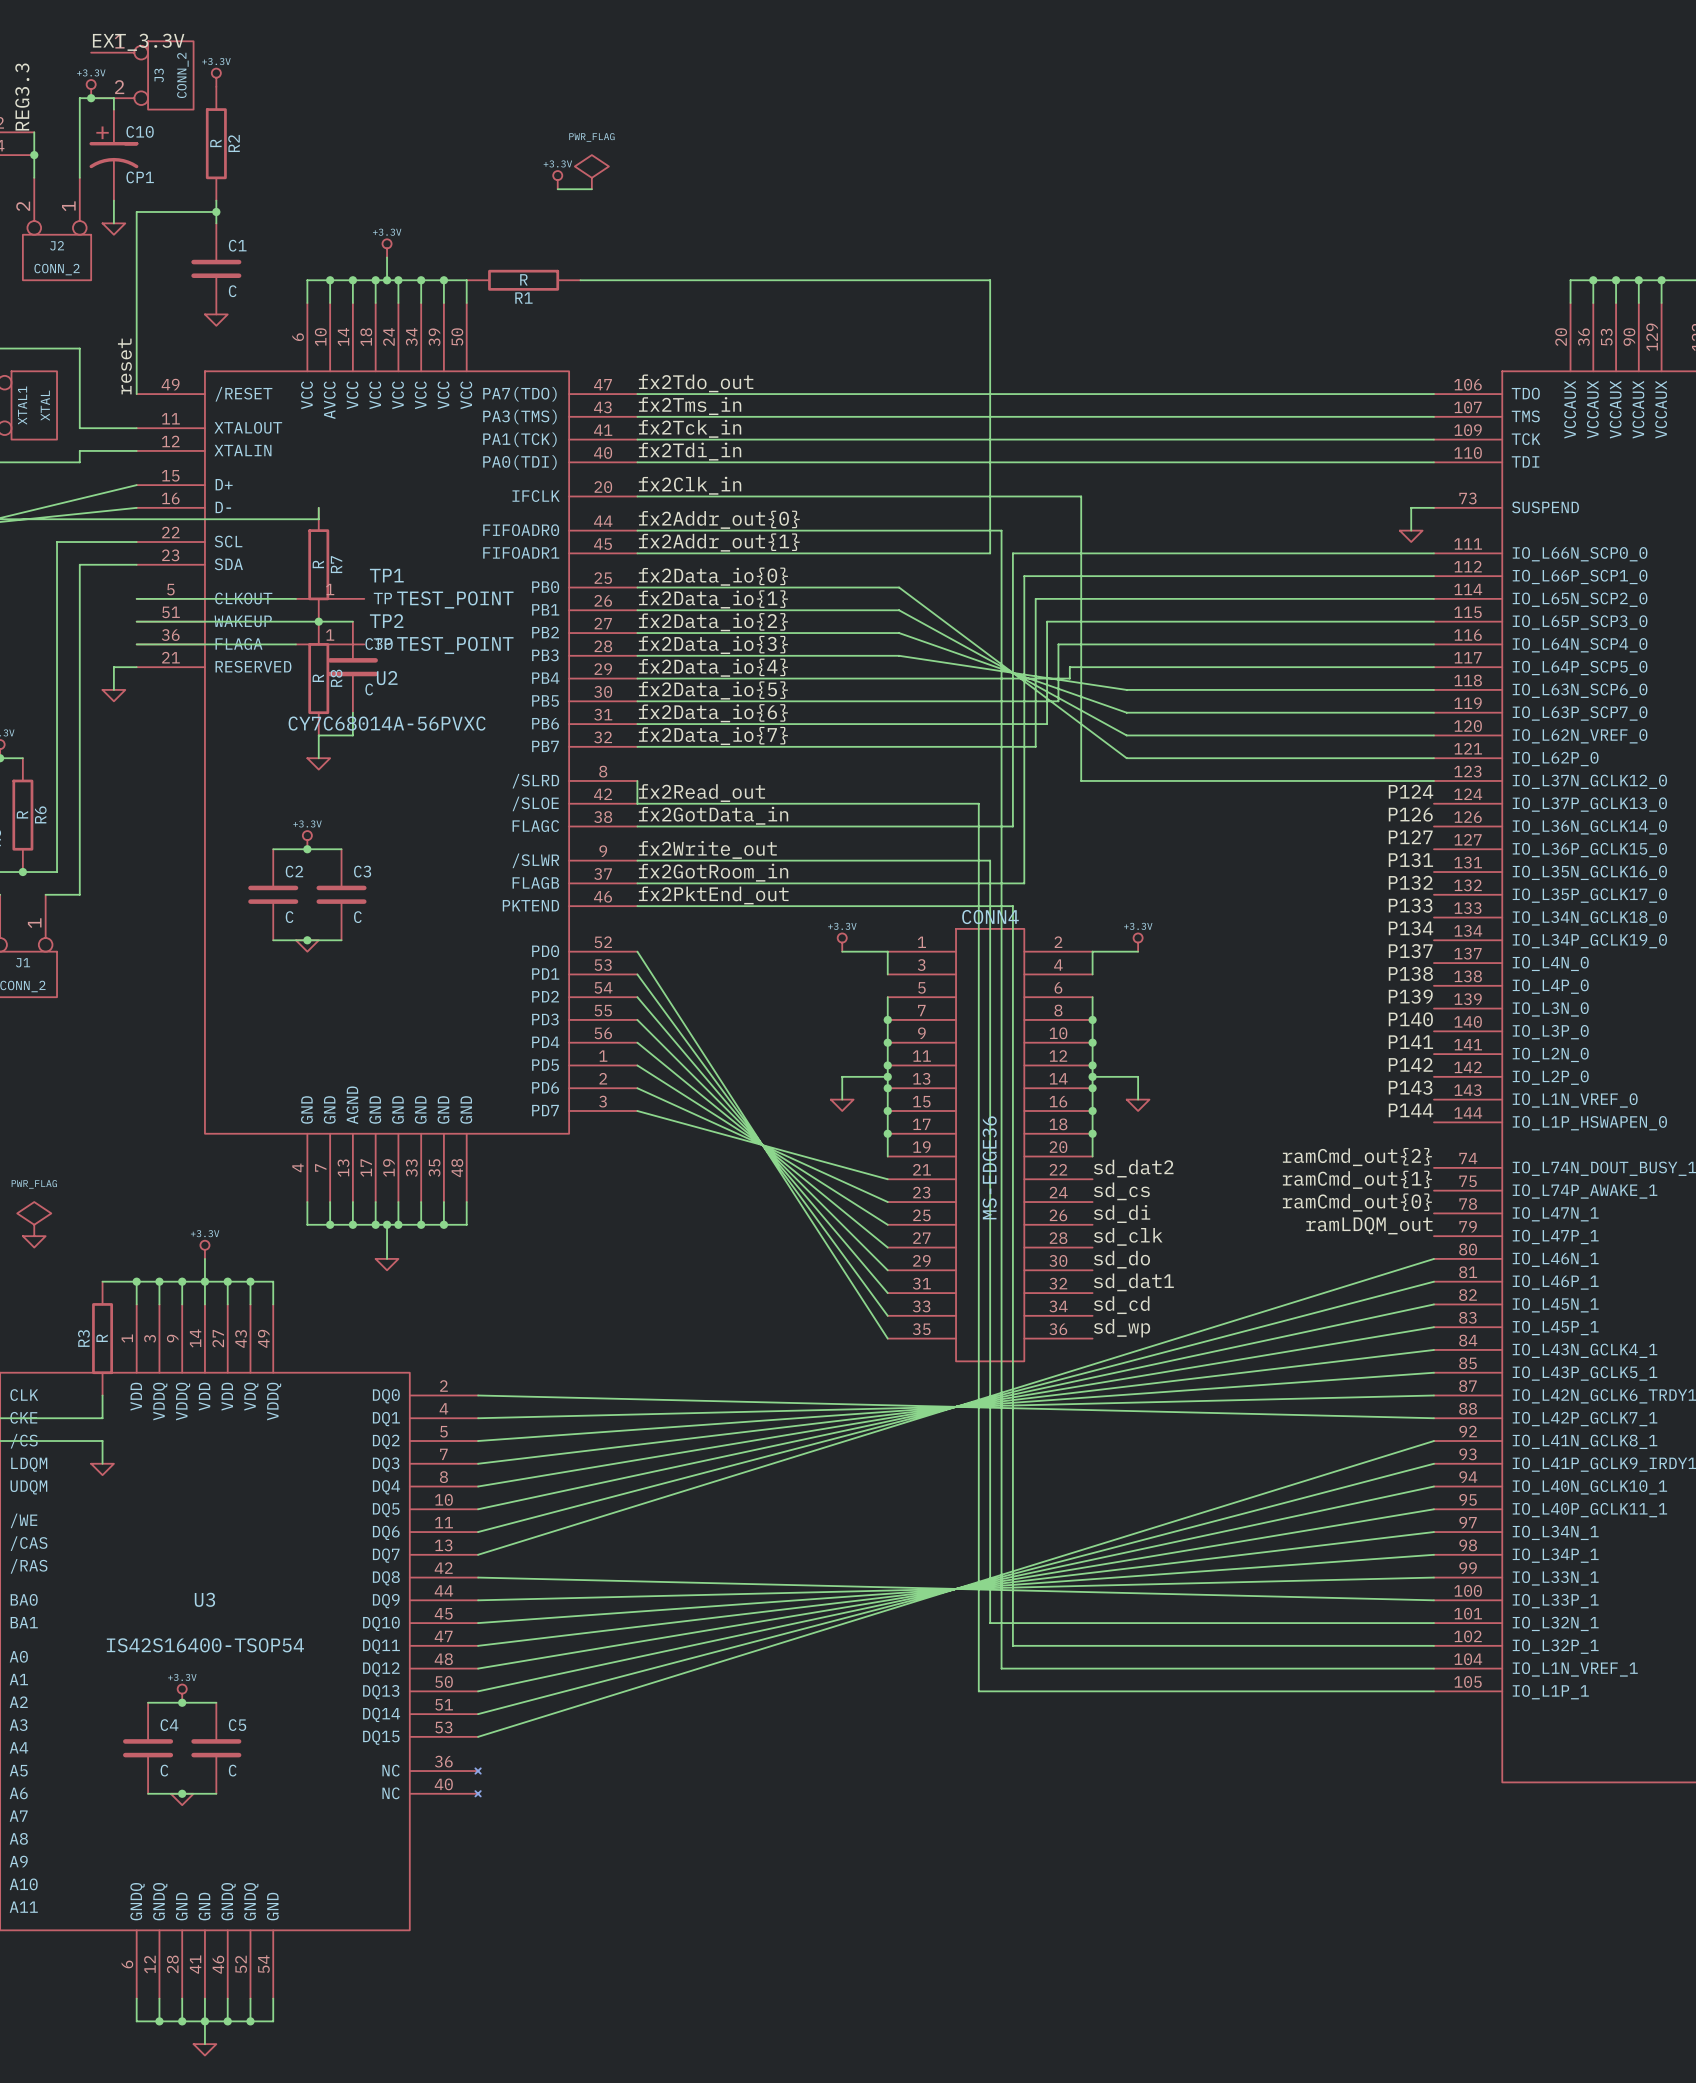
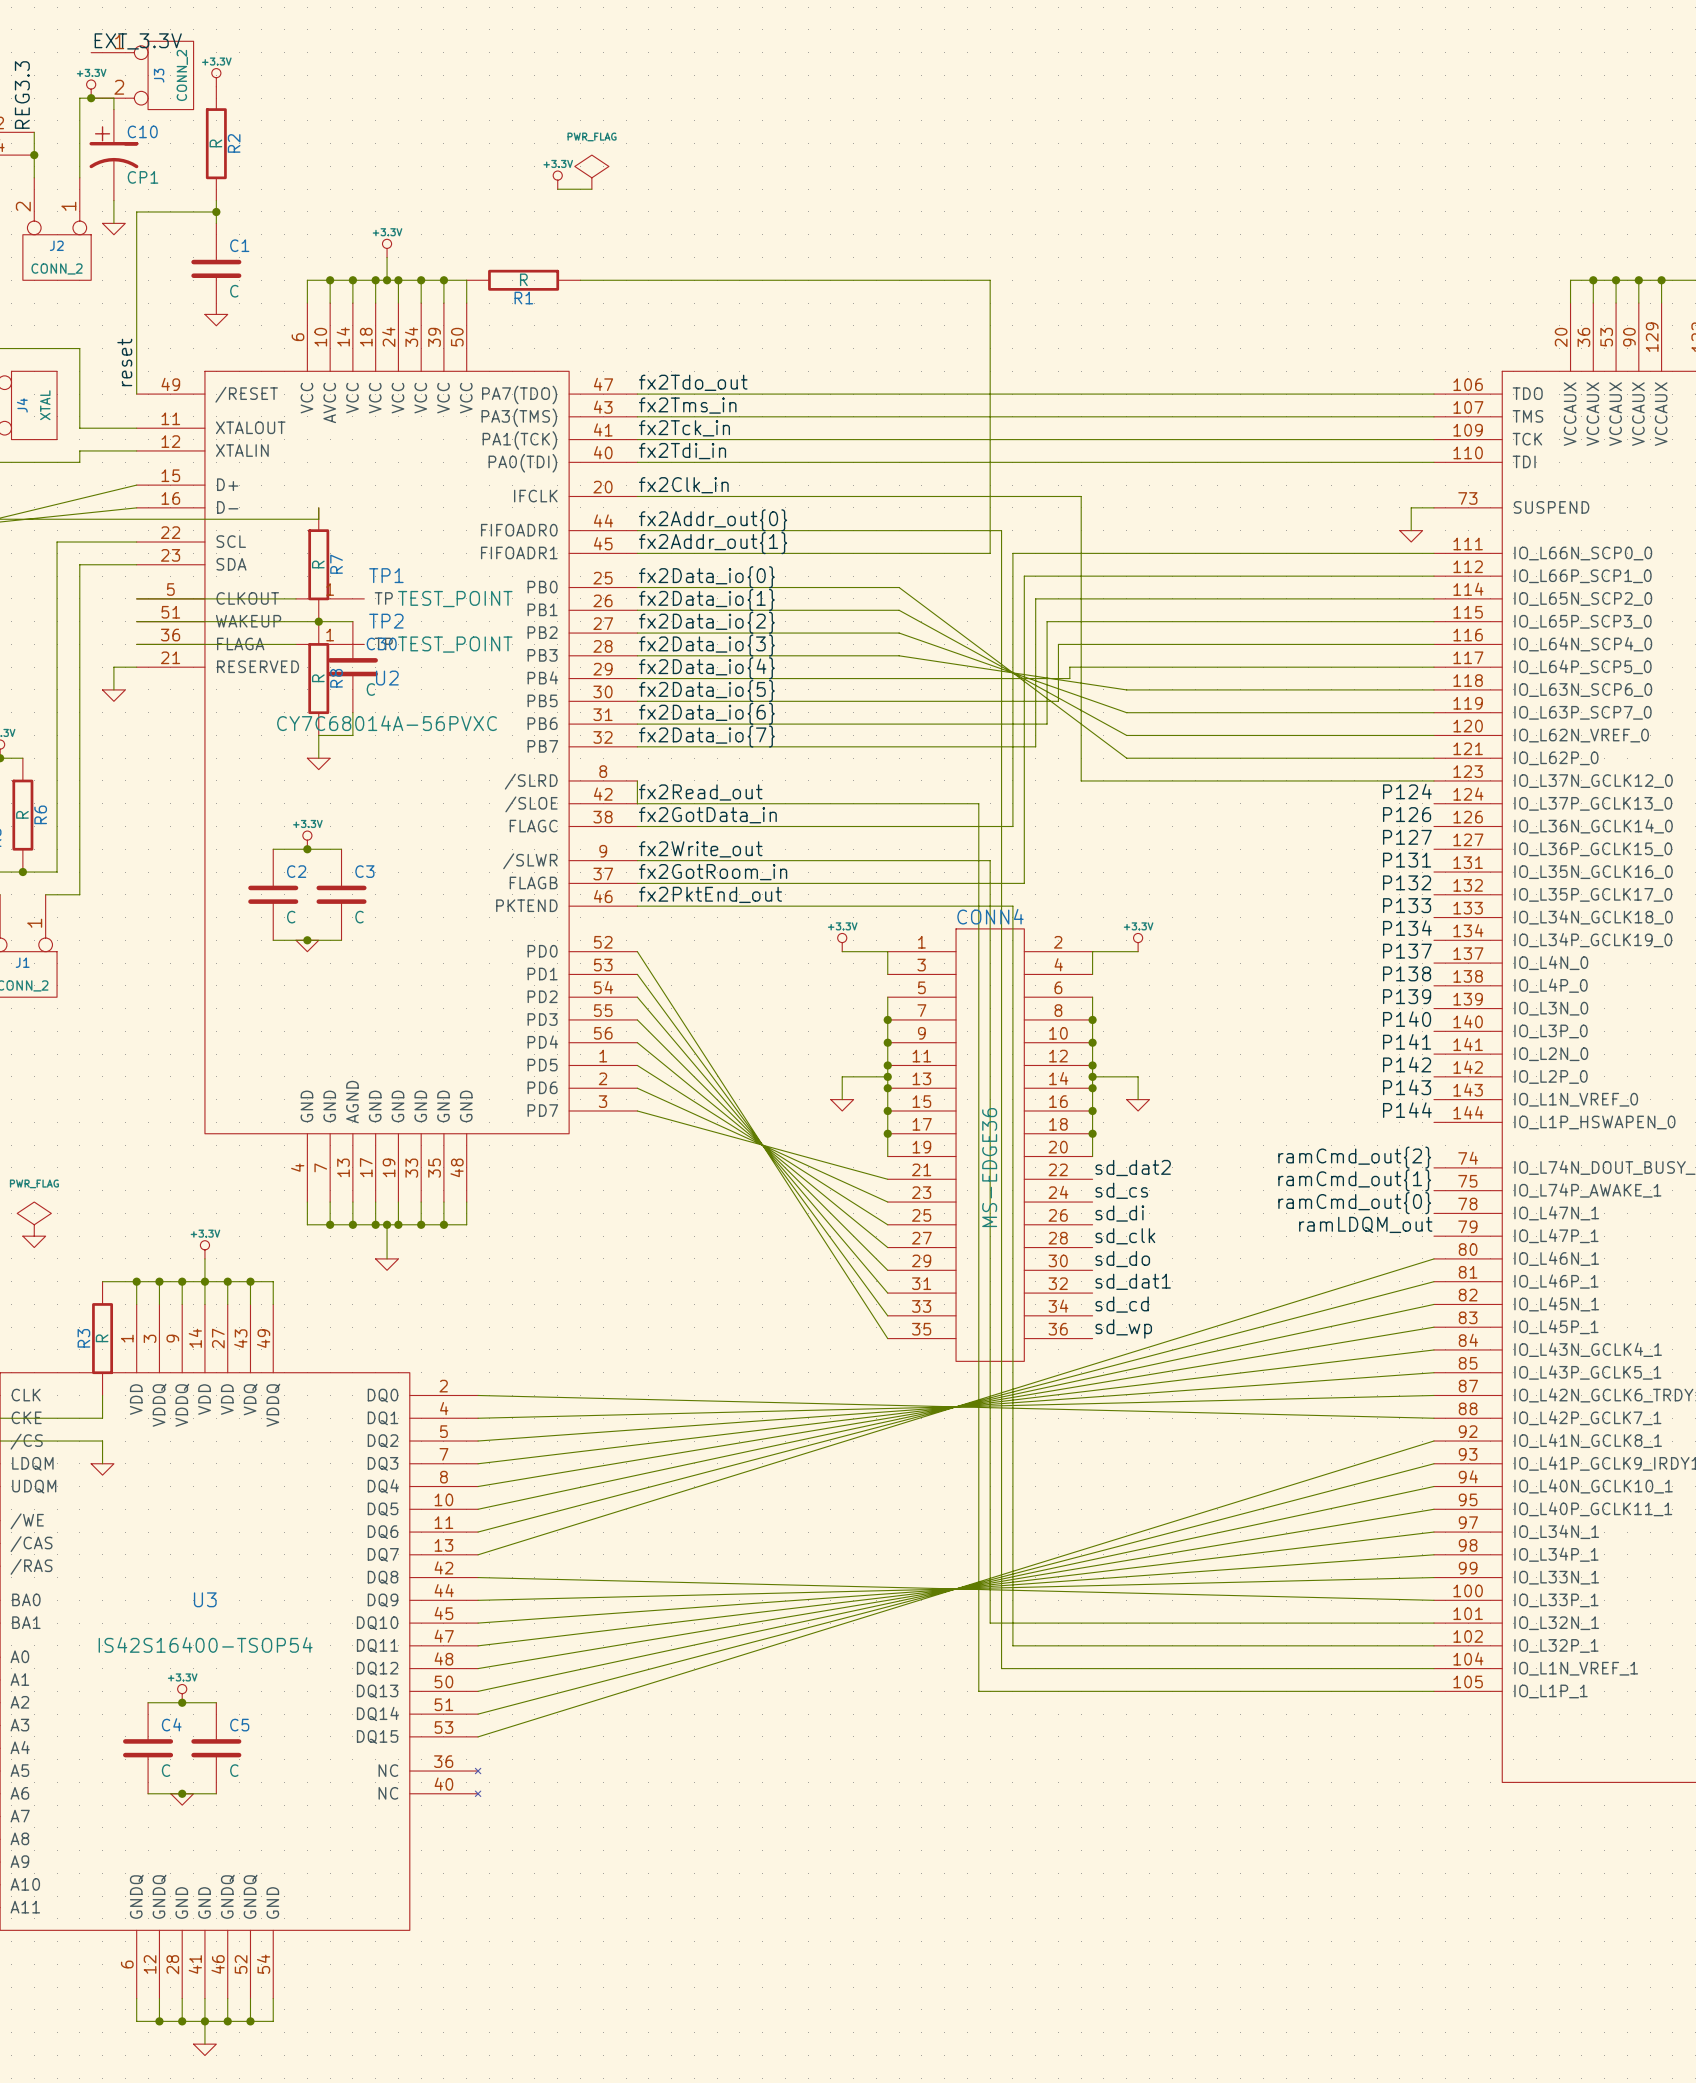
XTAL1 name: XTAL1 (22, 405) -> J4 (22, 405)

